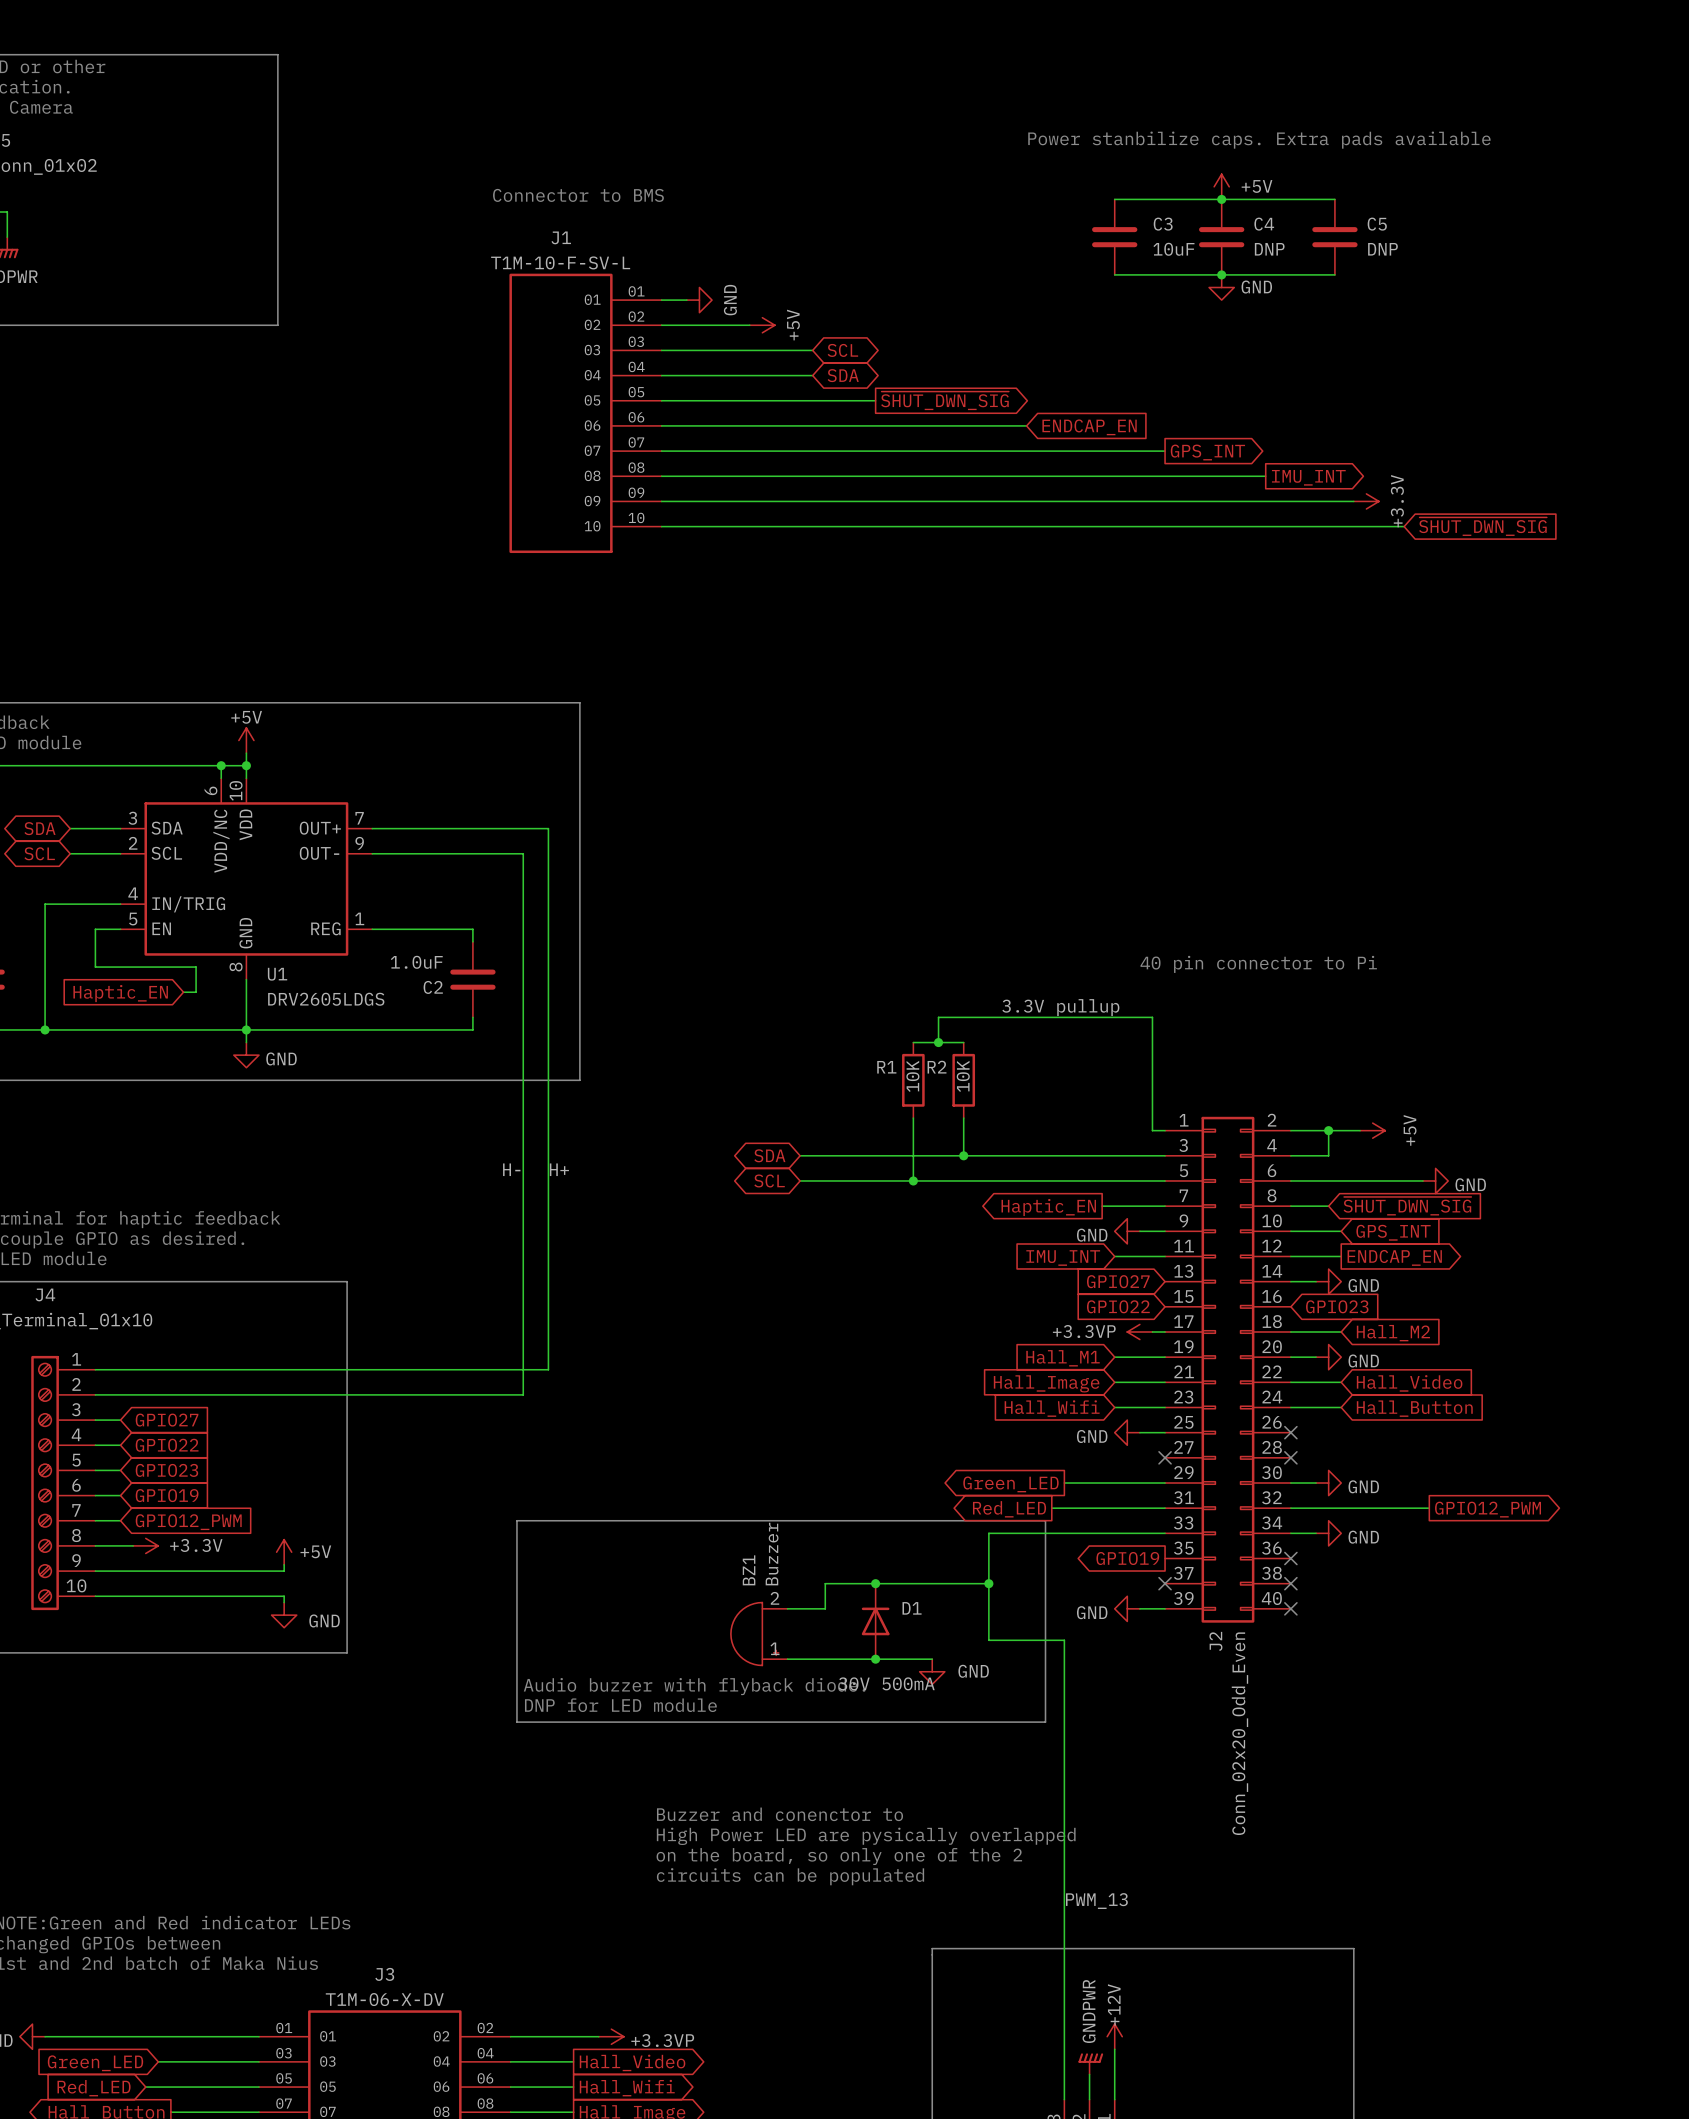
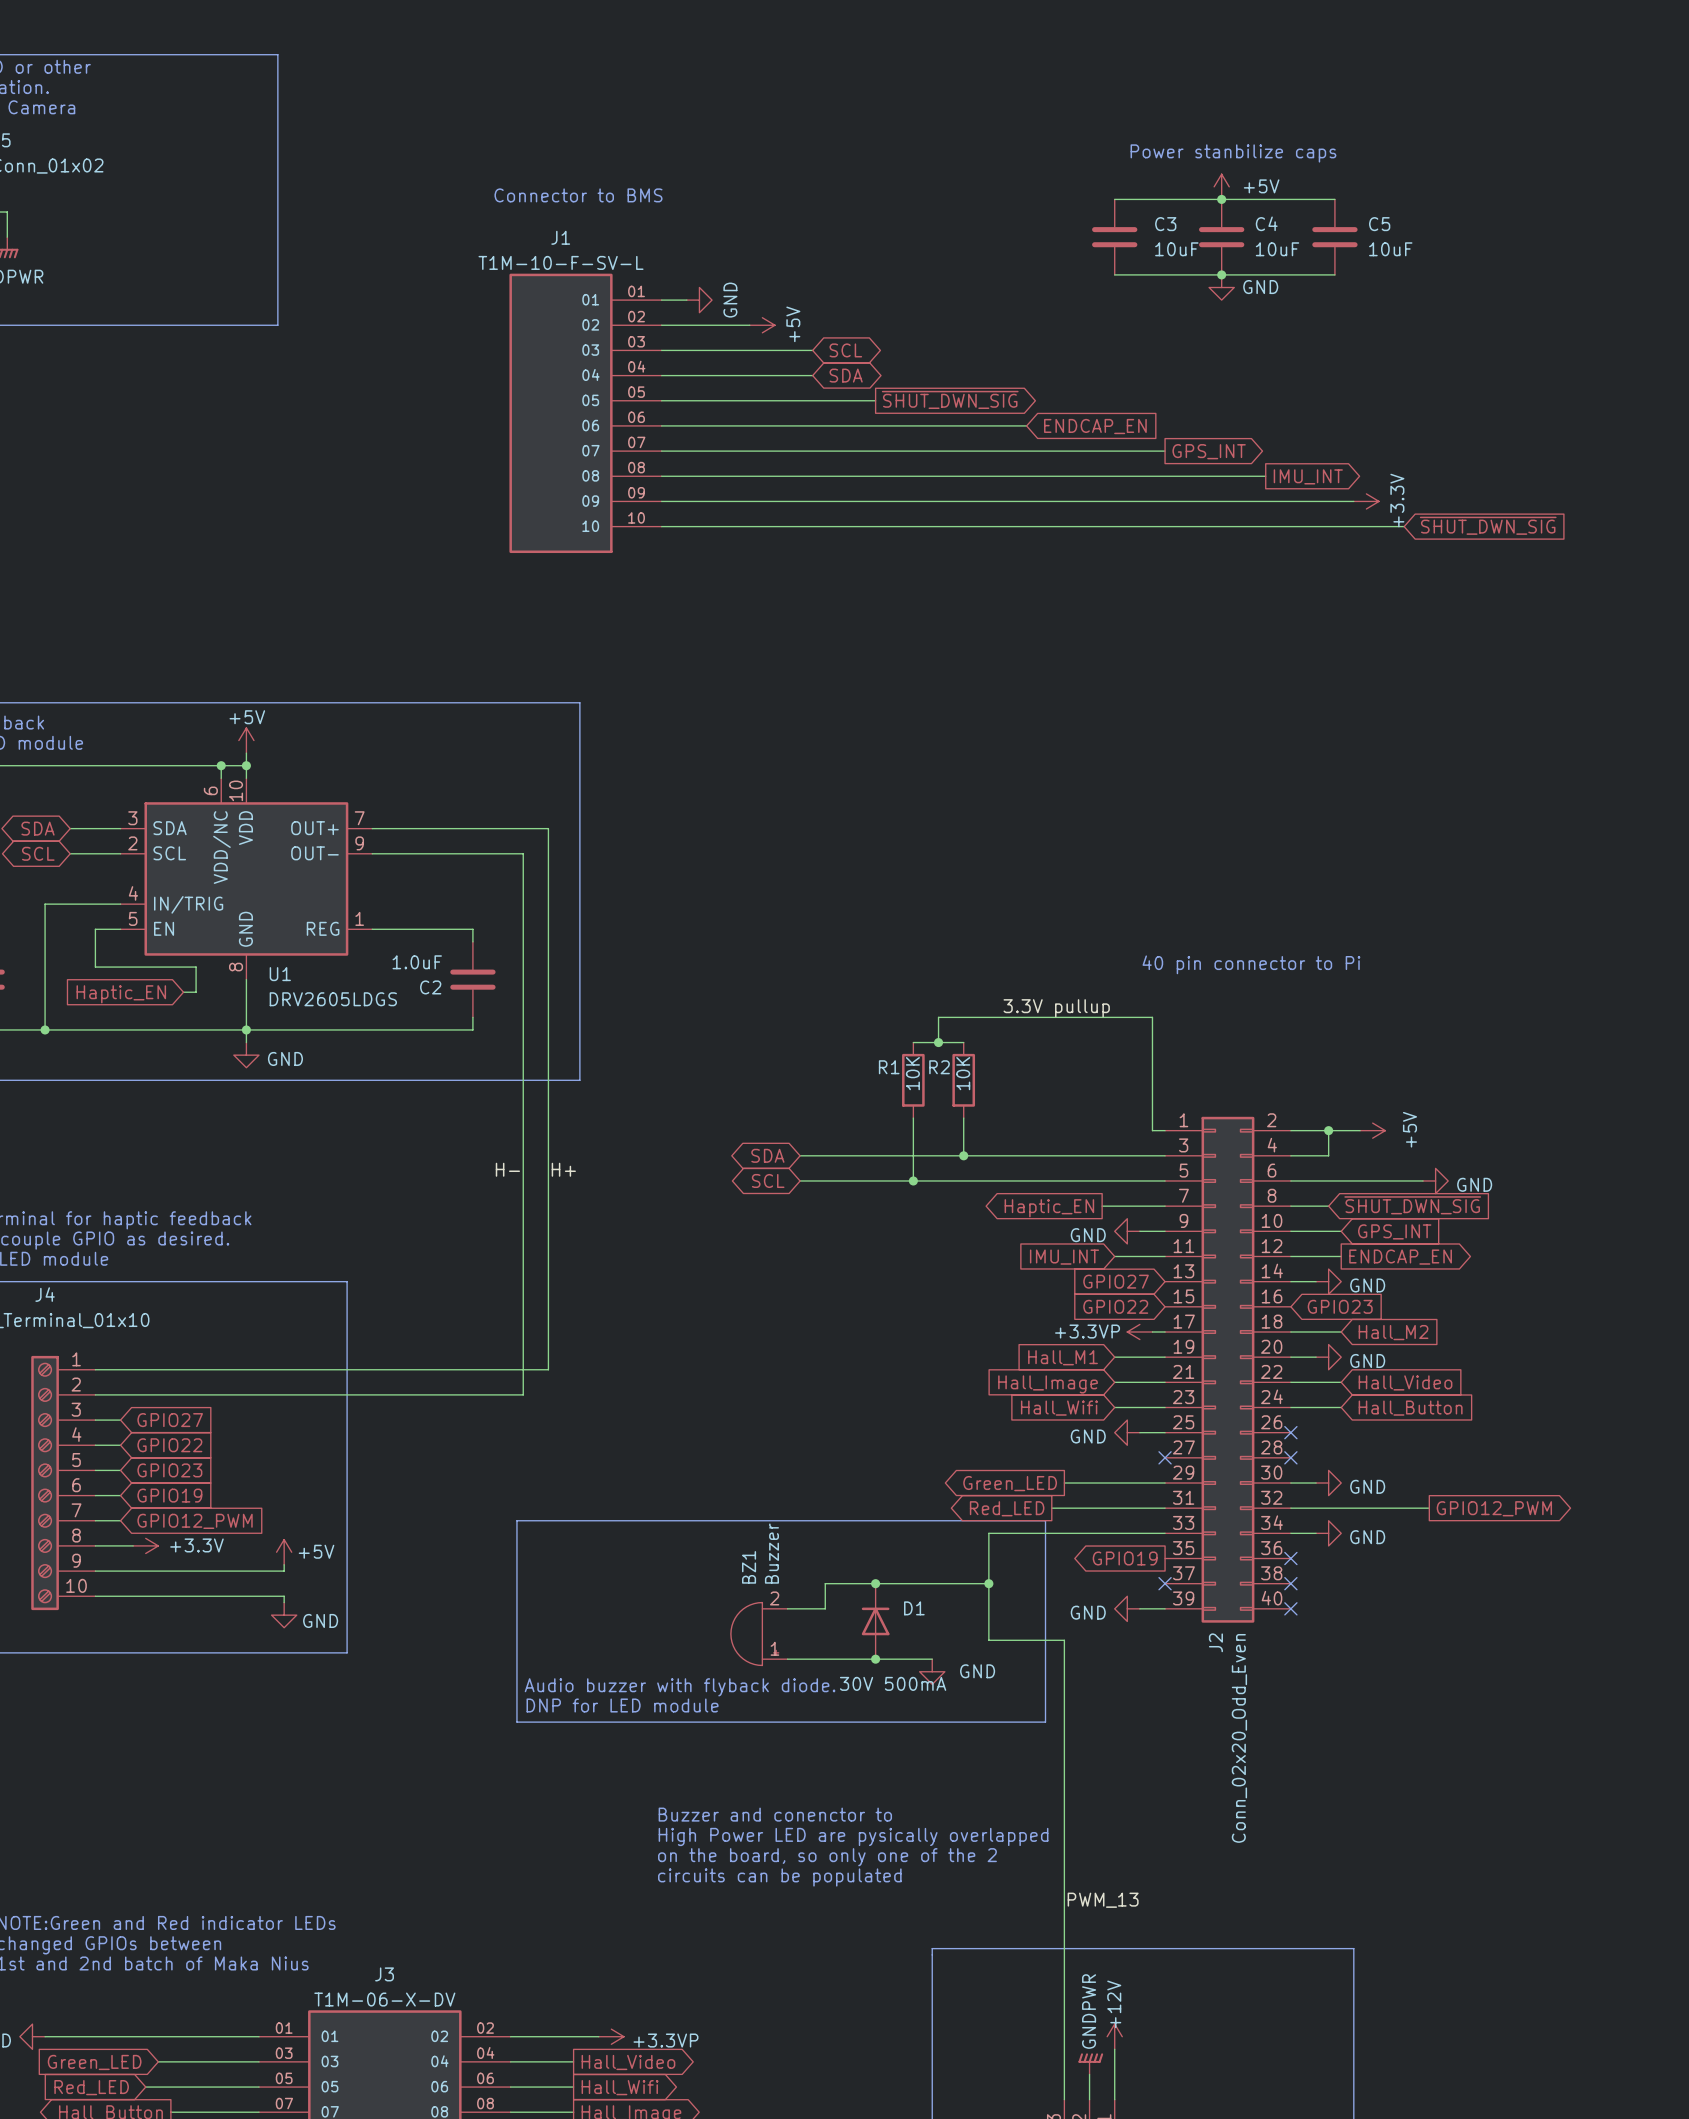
text: Power stanbilize caps. Extra pads available (1259, 140) -> Power stanbilize caps (1233, 153)
C4 value: DNP (1269, 249) -> 10uF (1277, 249)
C5 value: DNP (1382, 249) -> 10uF (1390, 249)

